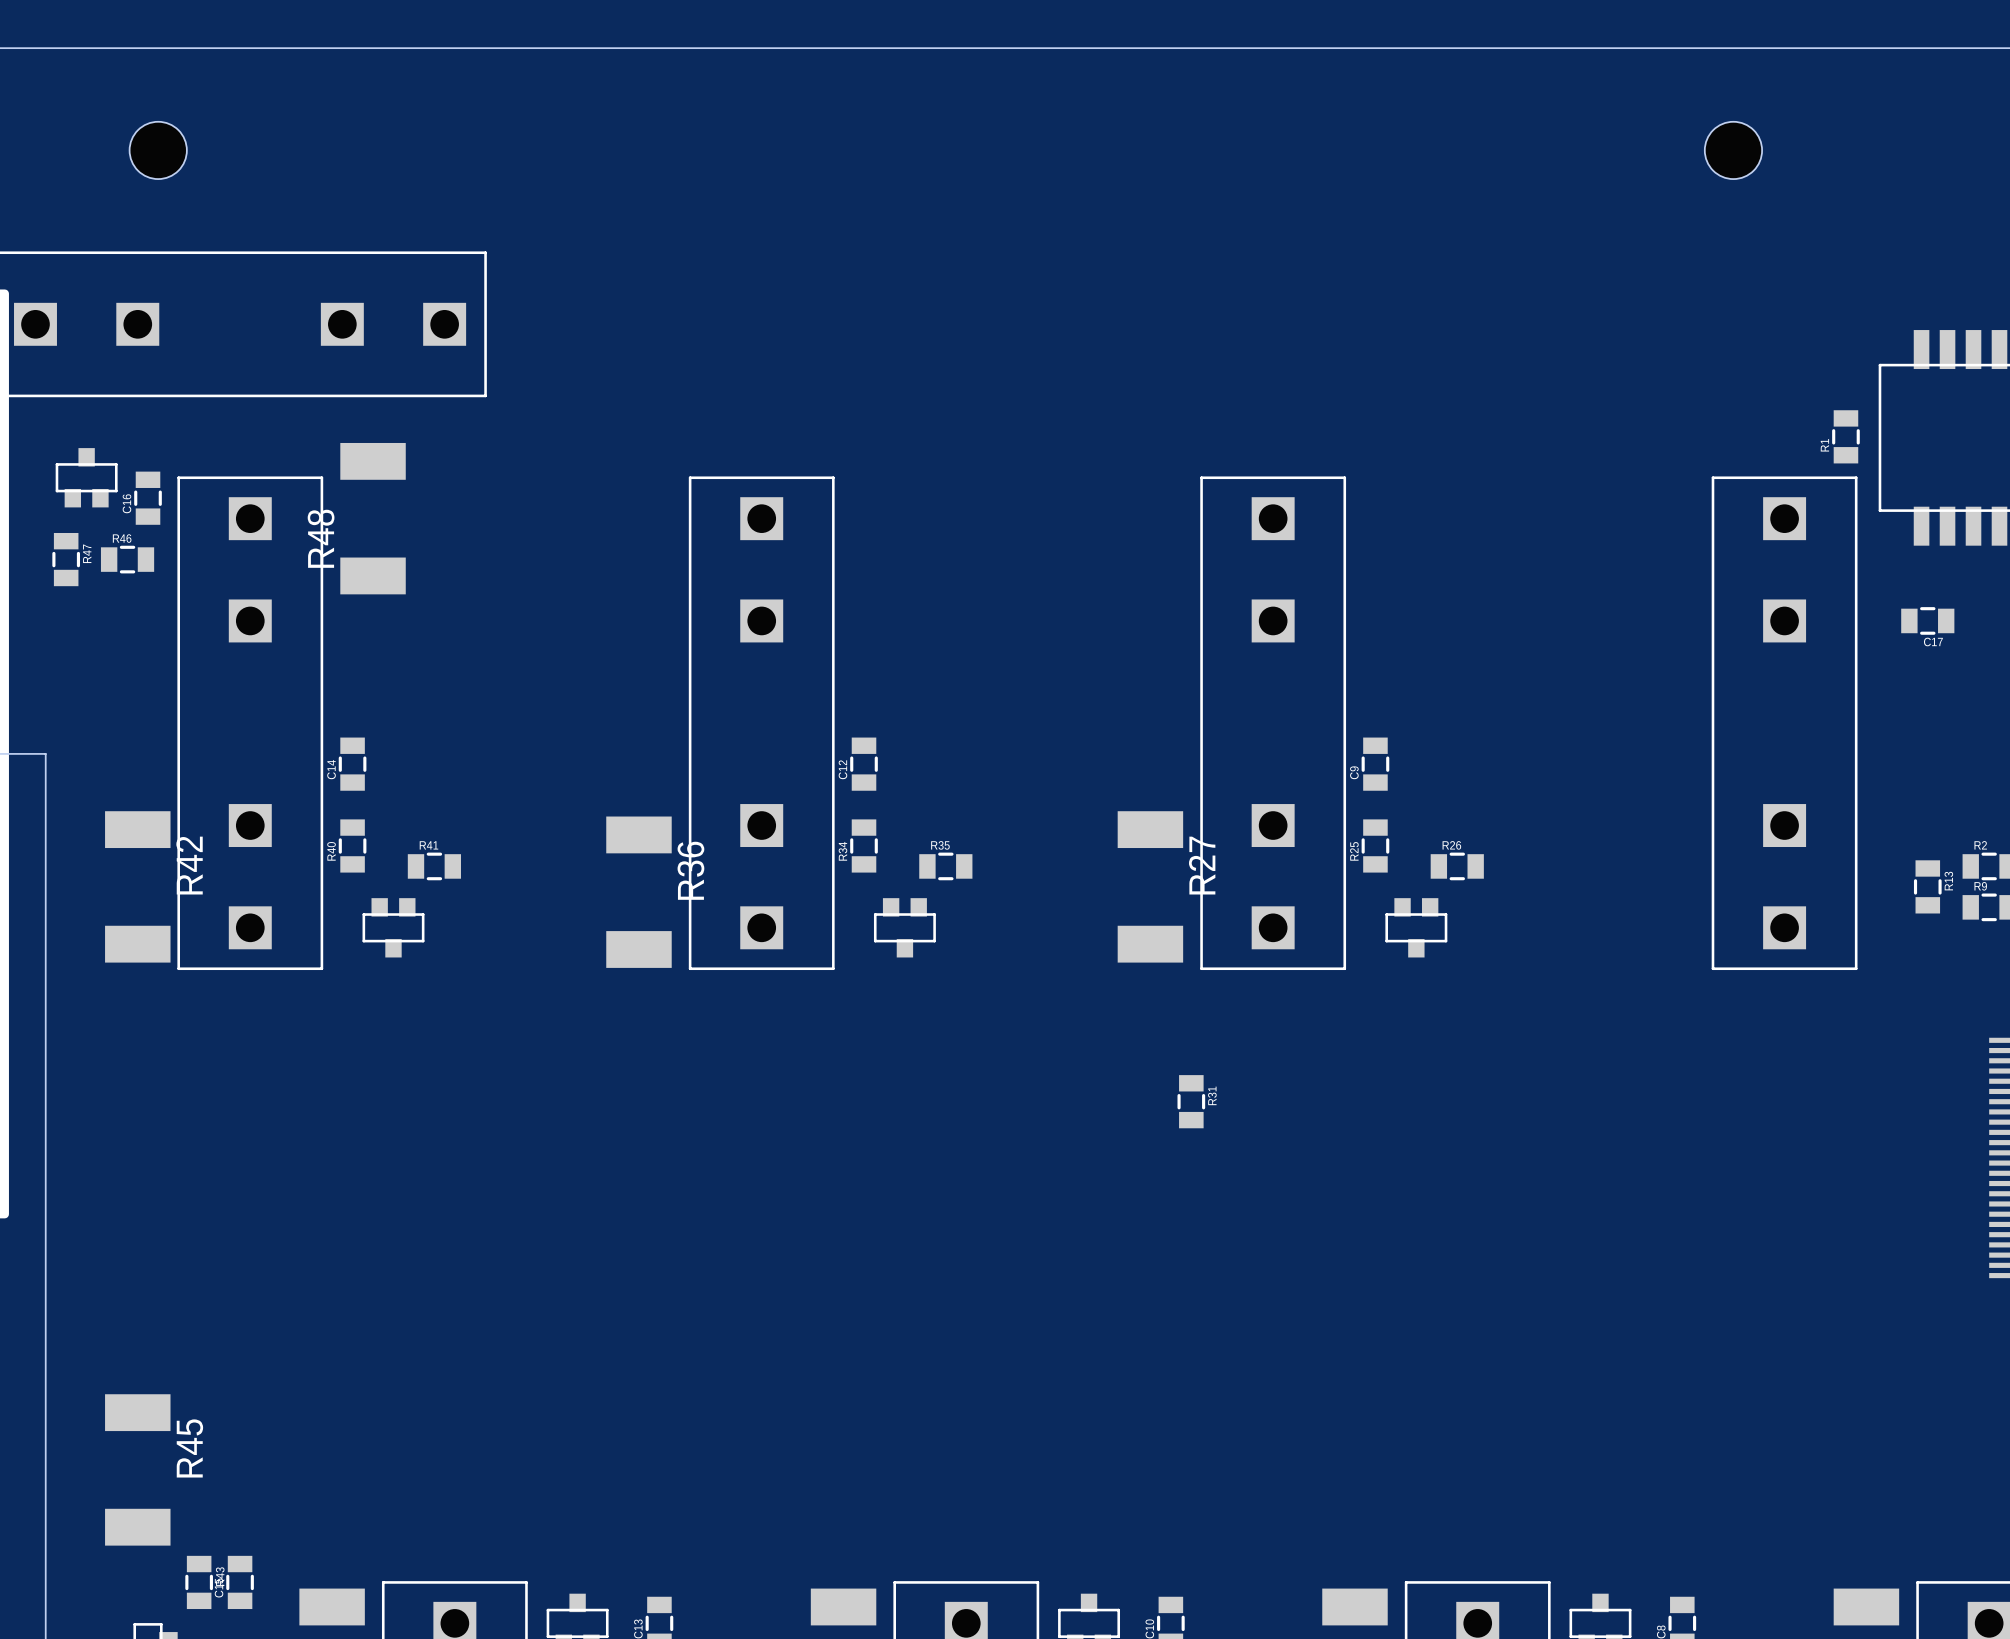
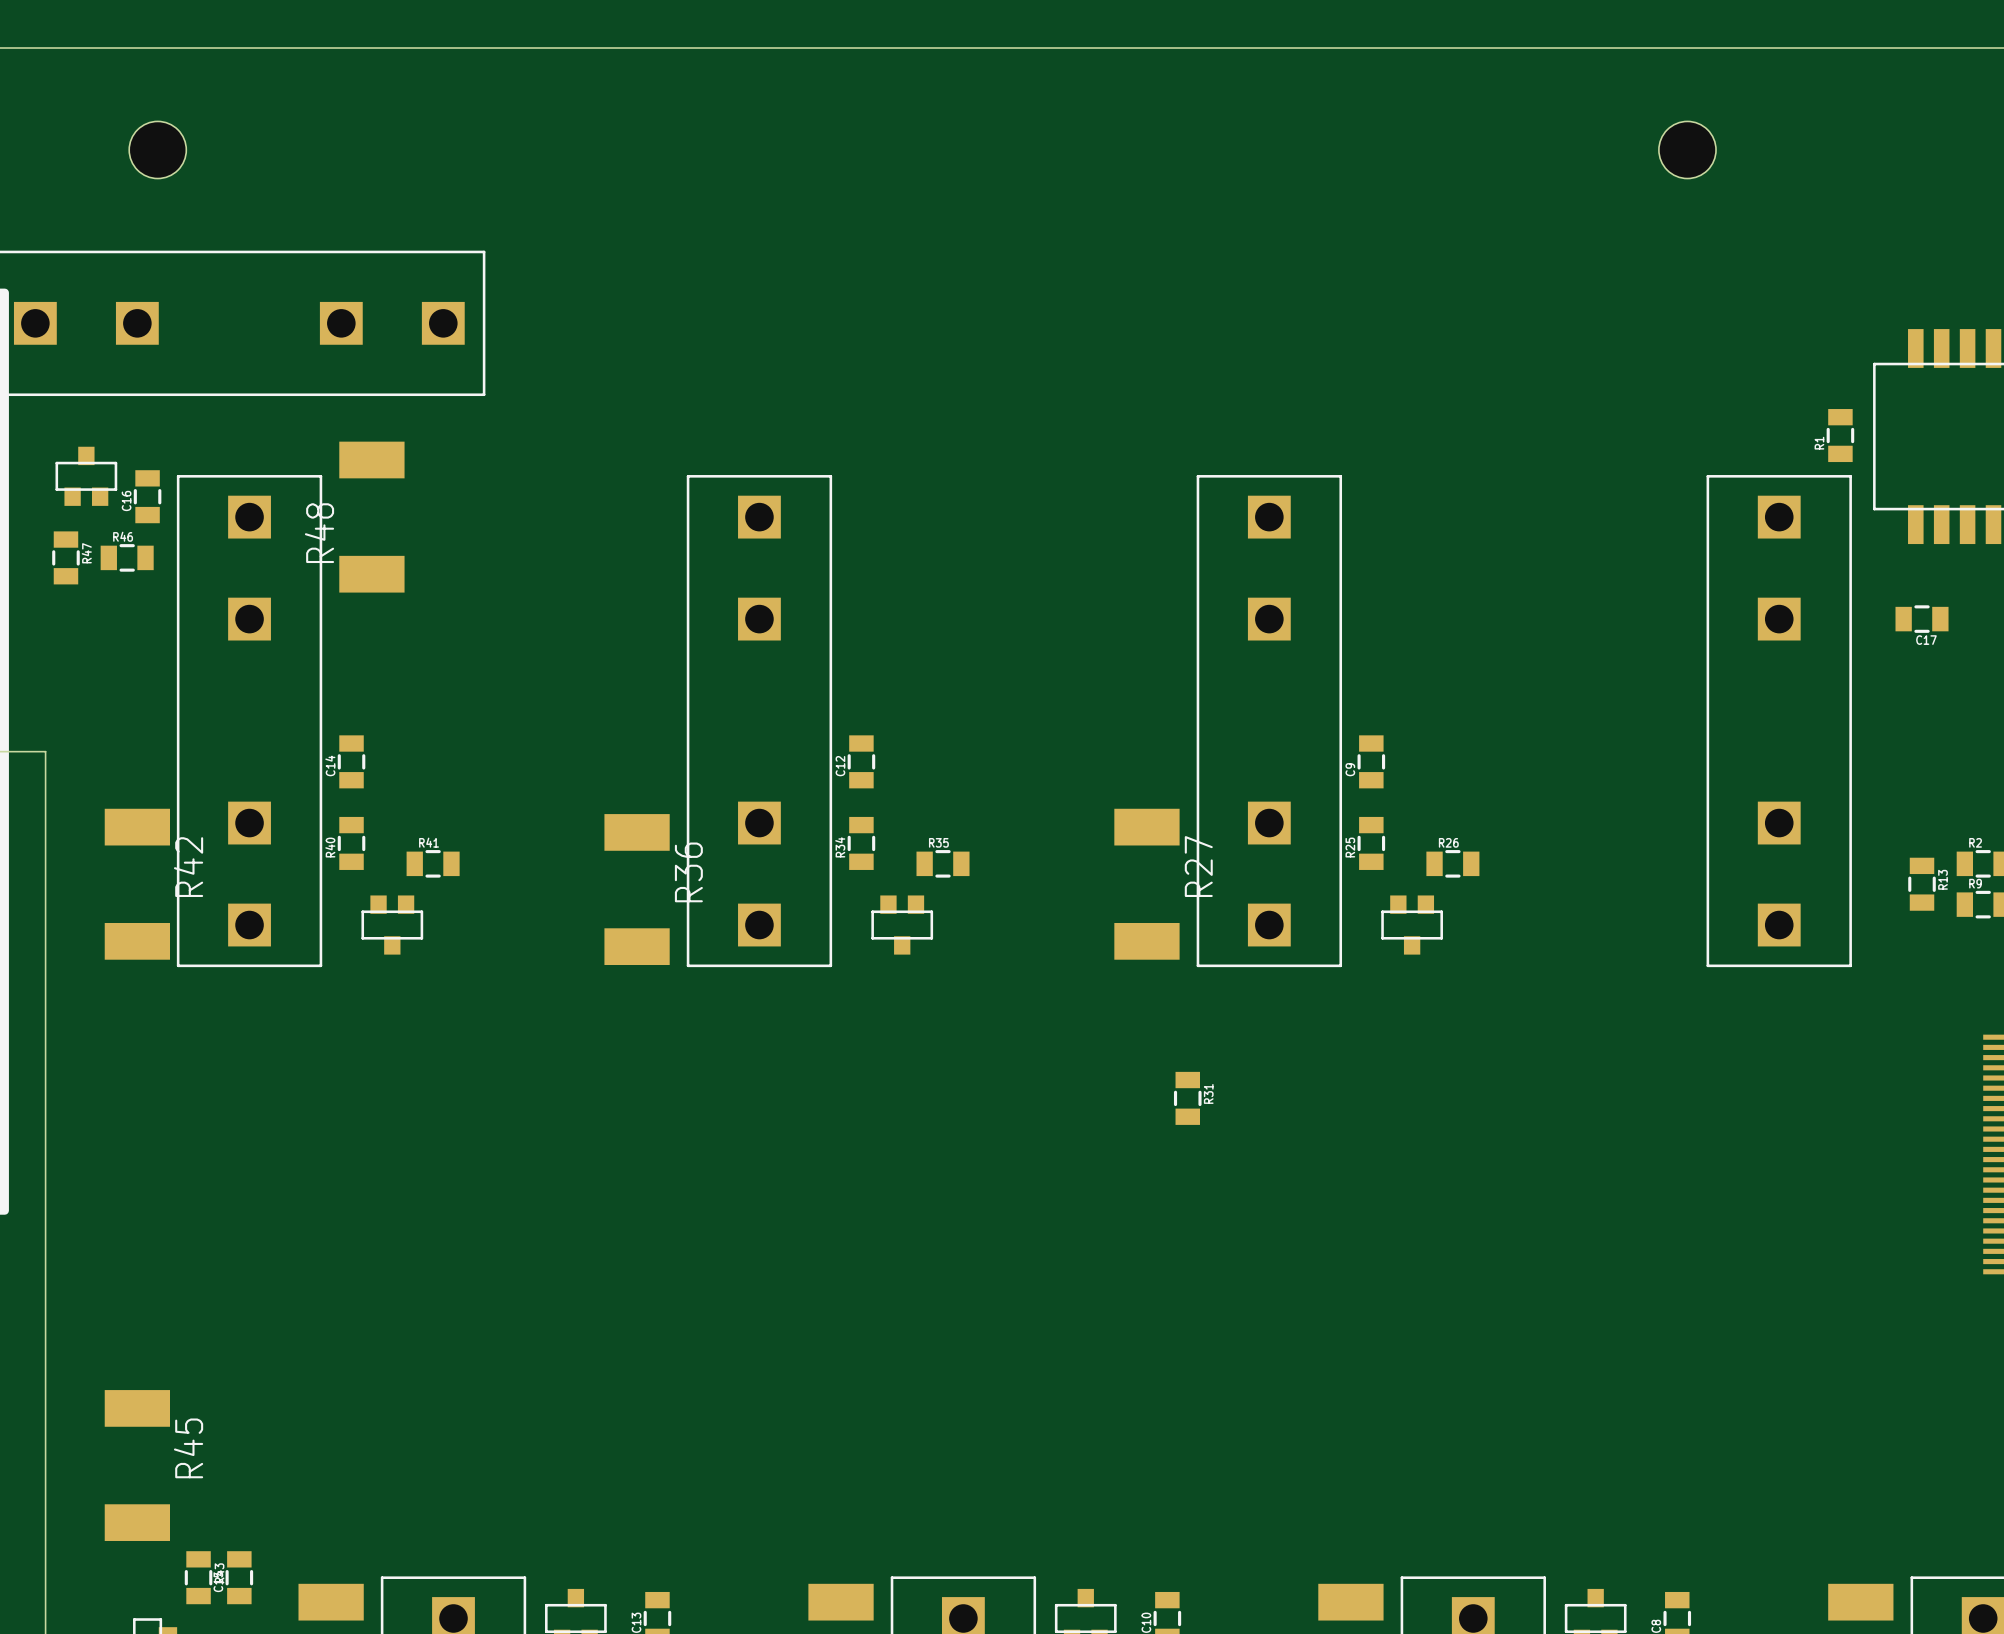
hole position: (1733, 150) -> (1687, 149)

